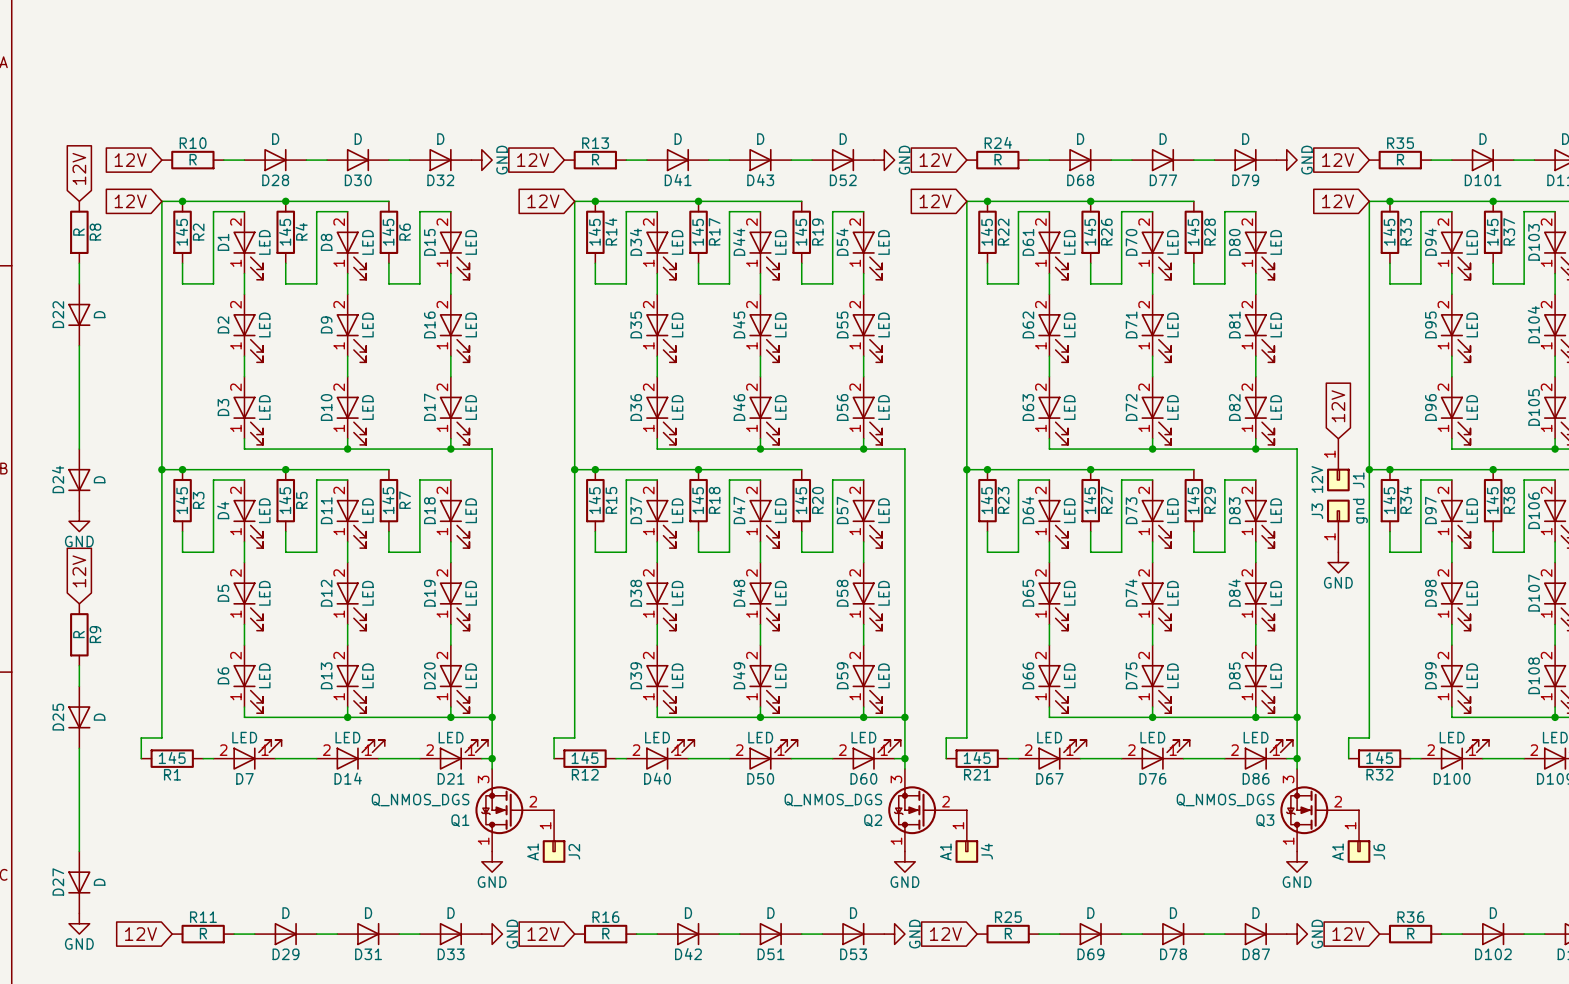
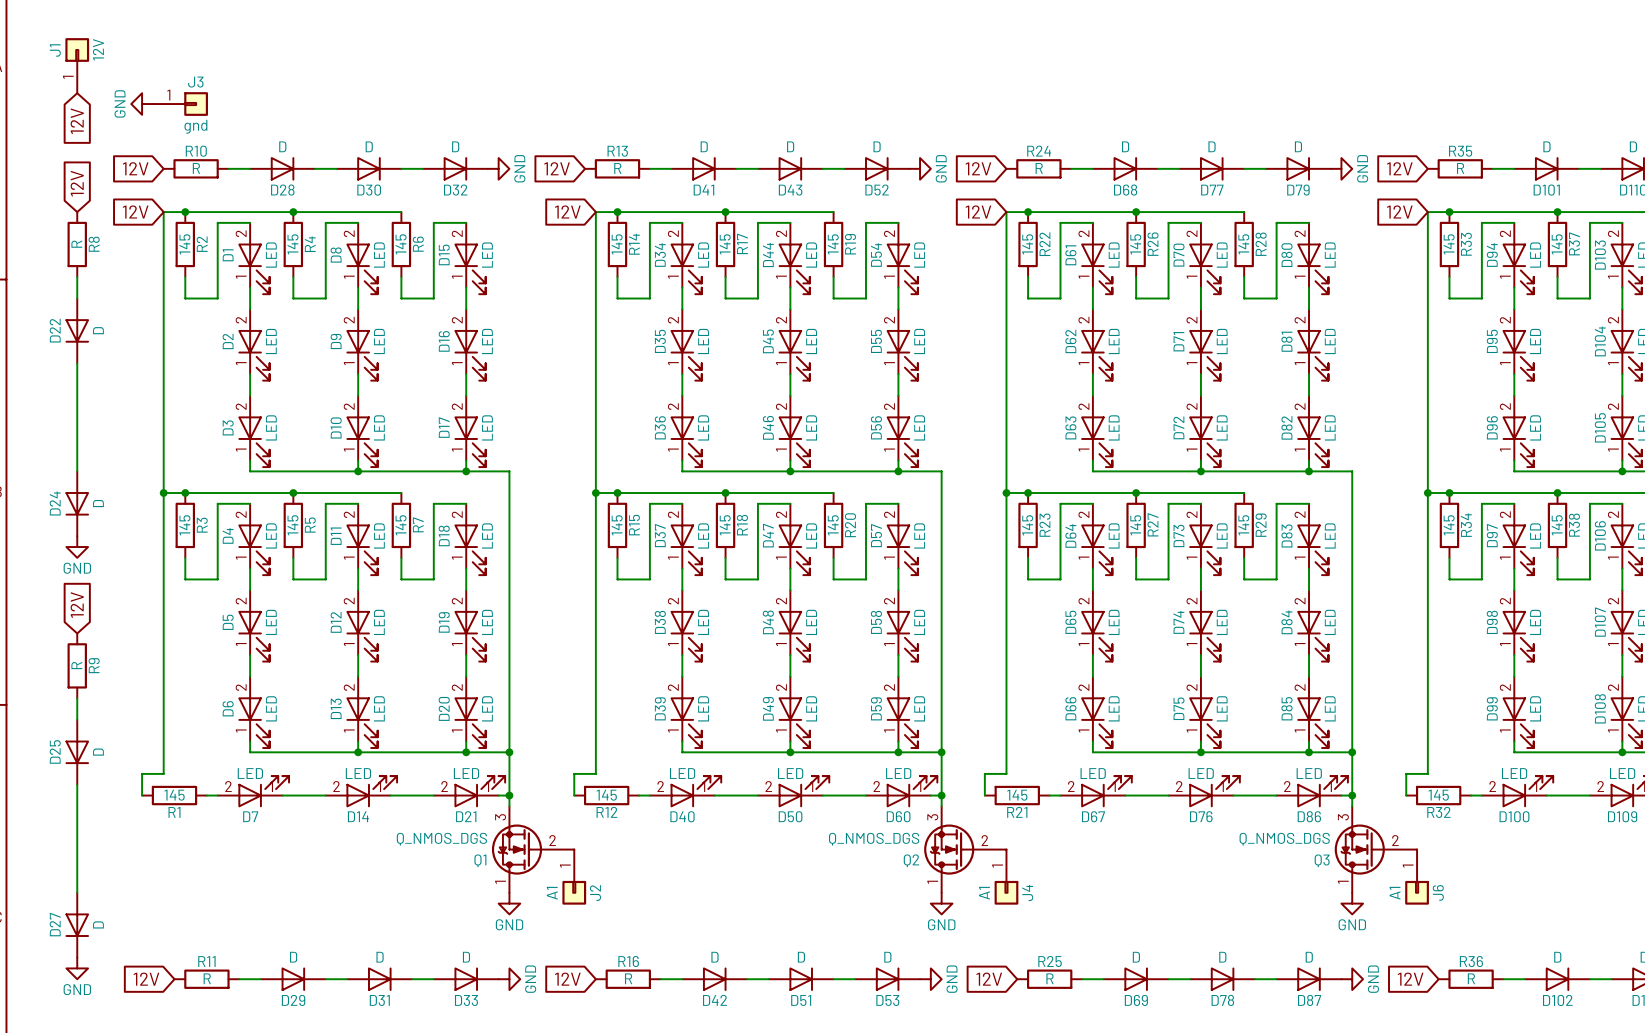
power symbol: none -> GND (142, 104)
global label: none -> 12V (77, 121)
global label: 12V (1338, 406) -> none
J1 position: (1338, 465) -> (77, 65)
J1 rotation: 0° (1338, 479) -> 180° (77, 50)
J3 rotation: 0° (1338, 510) -> 90° clockwise (196, 104)
J3 position: (1338, 525) -> (180, 104)
power symbol: GND (1338, 562) -> none

